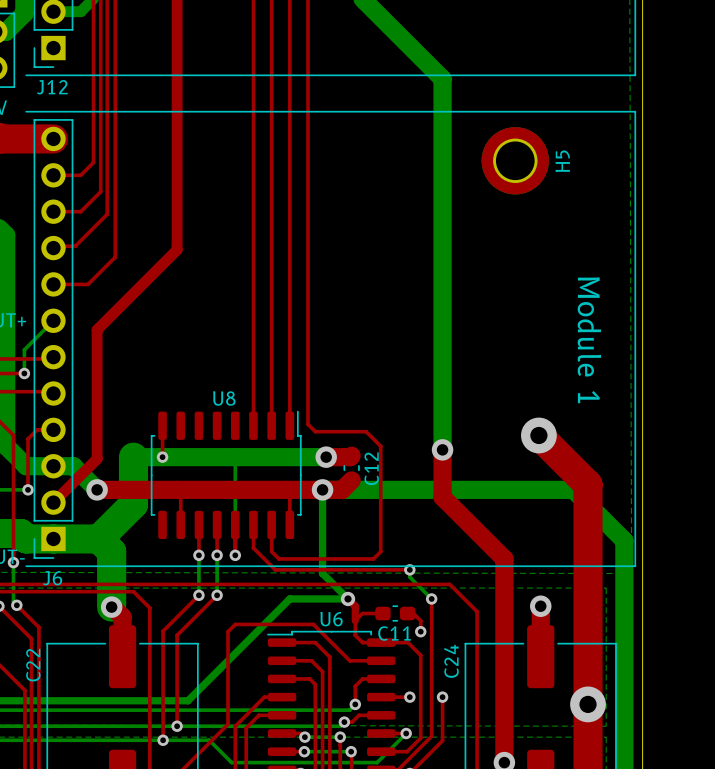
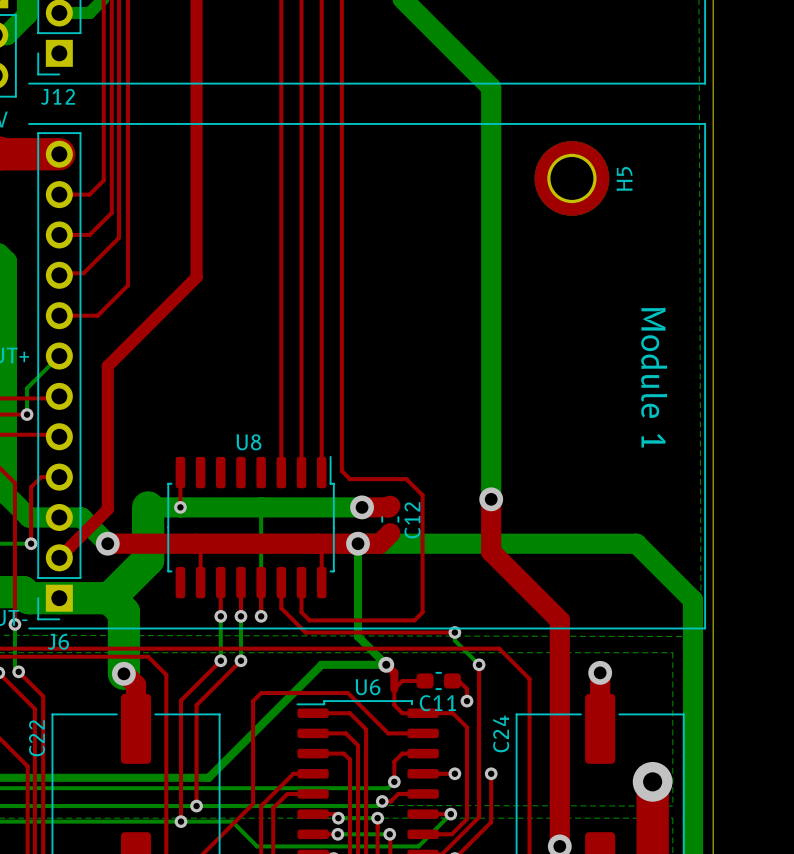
top track: (538, 435) (588, 484) (588, 704) -> none
via: (538, 435) -> none

